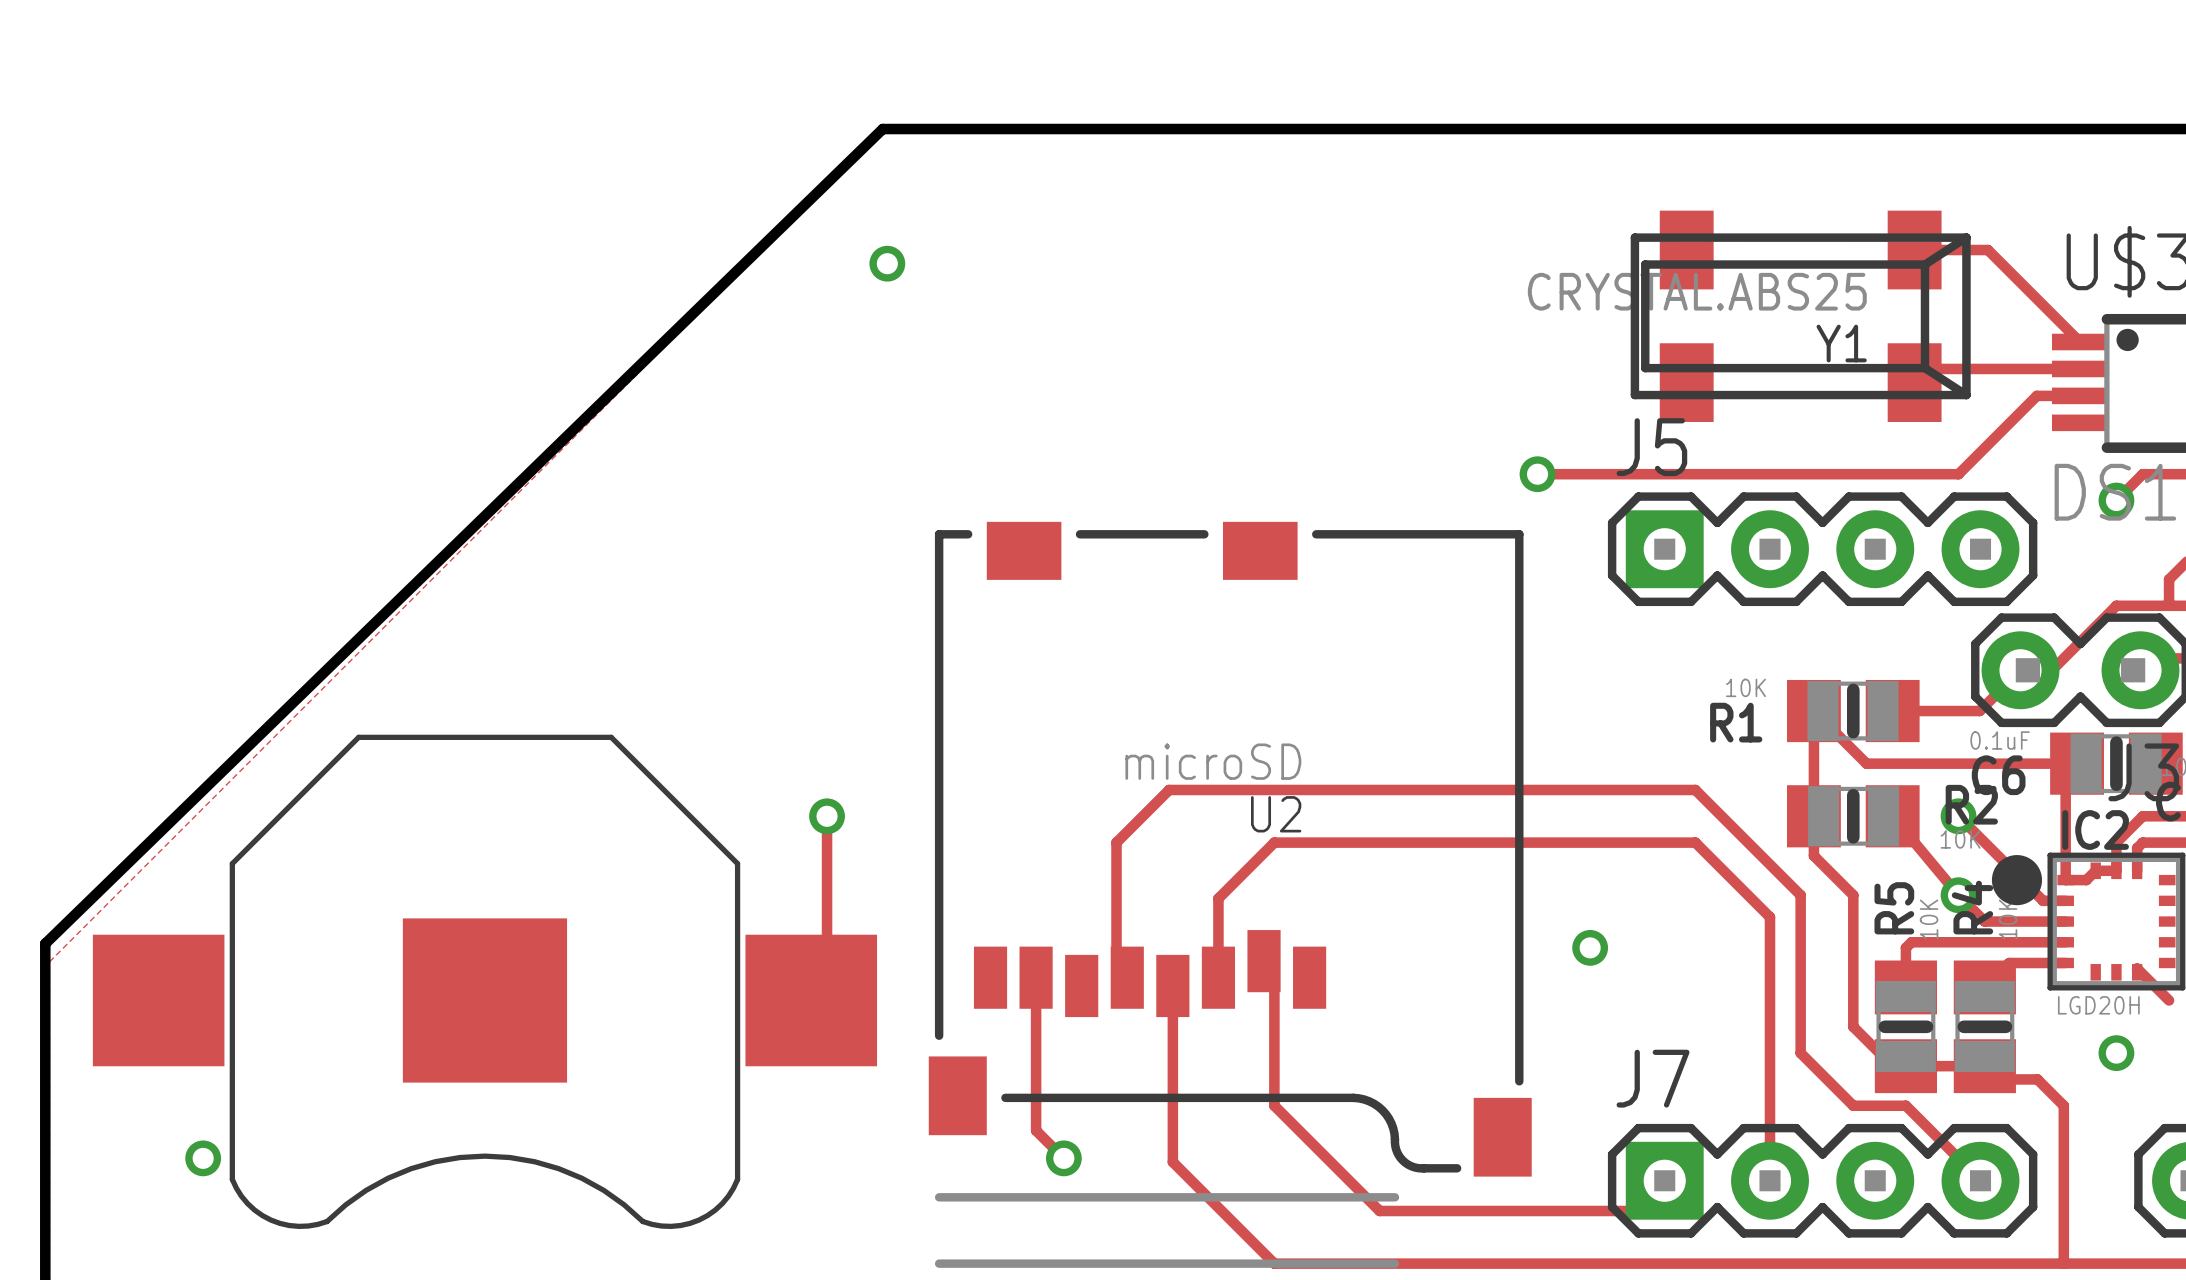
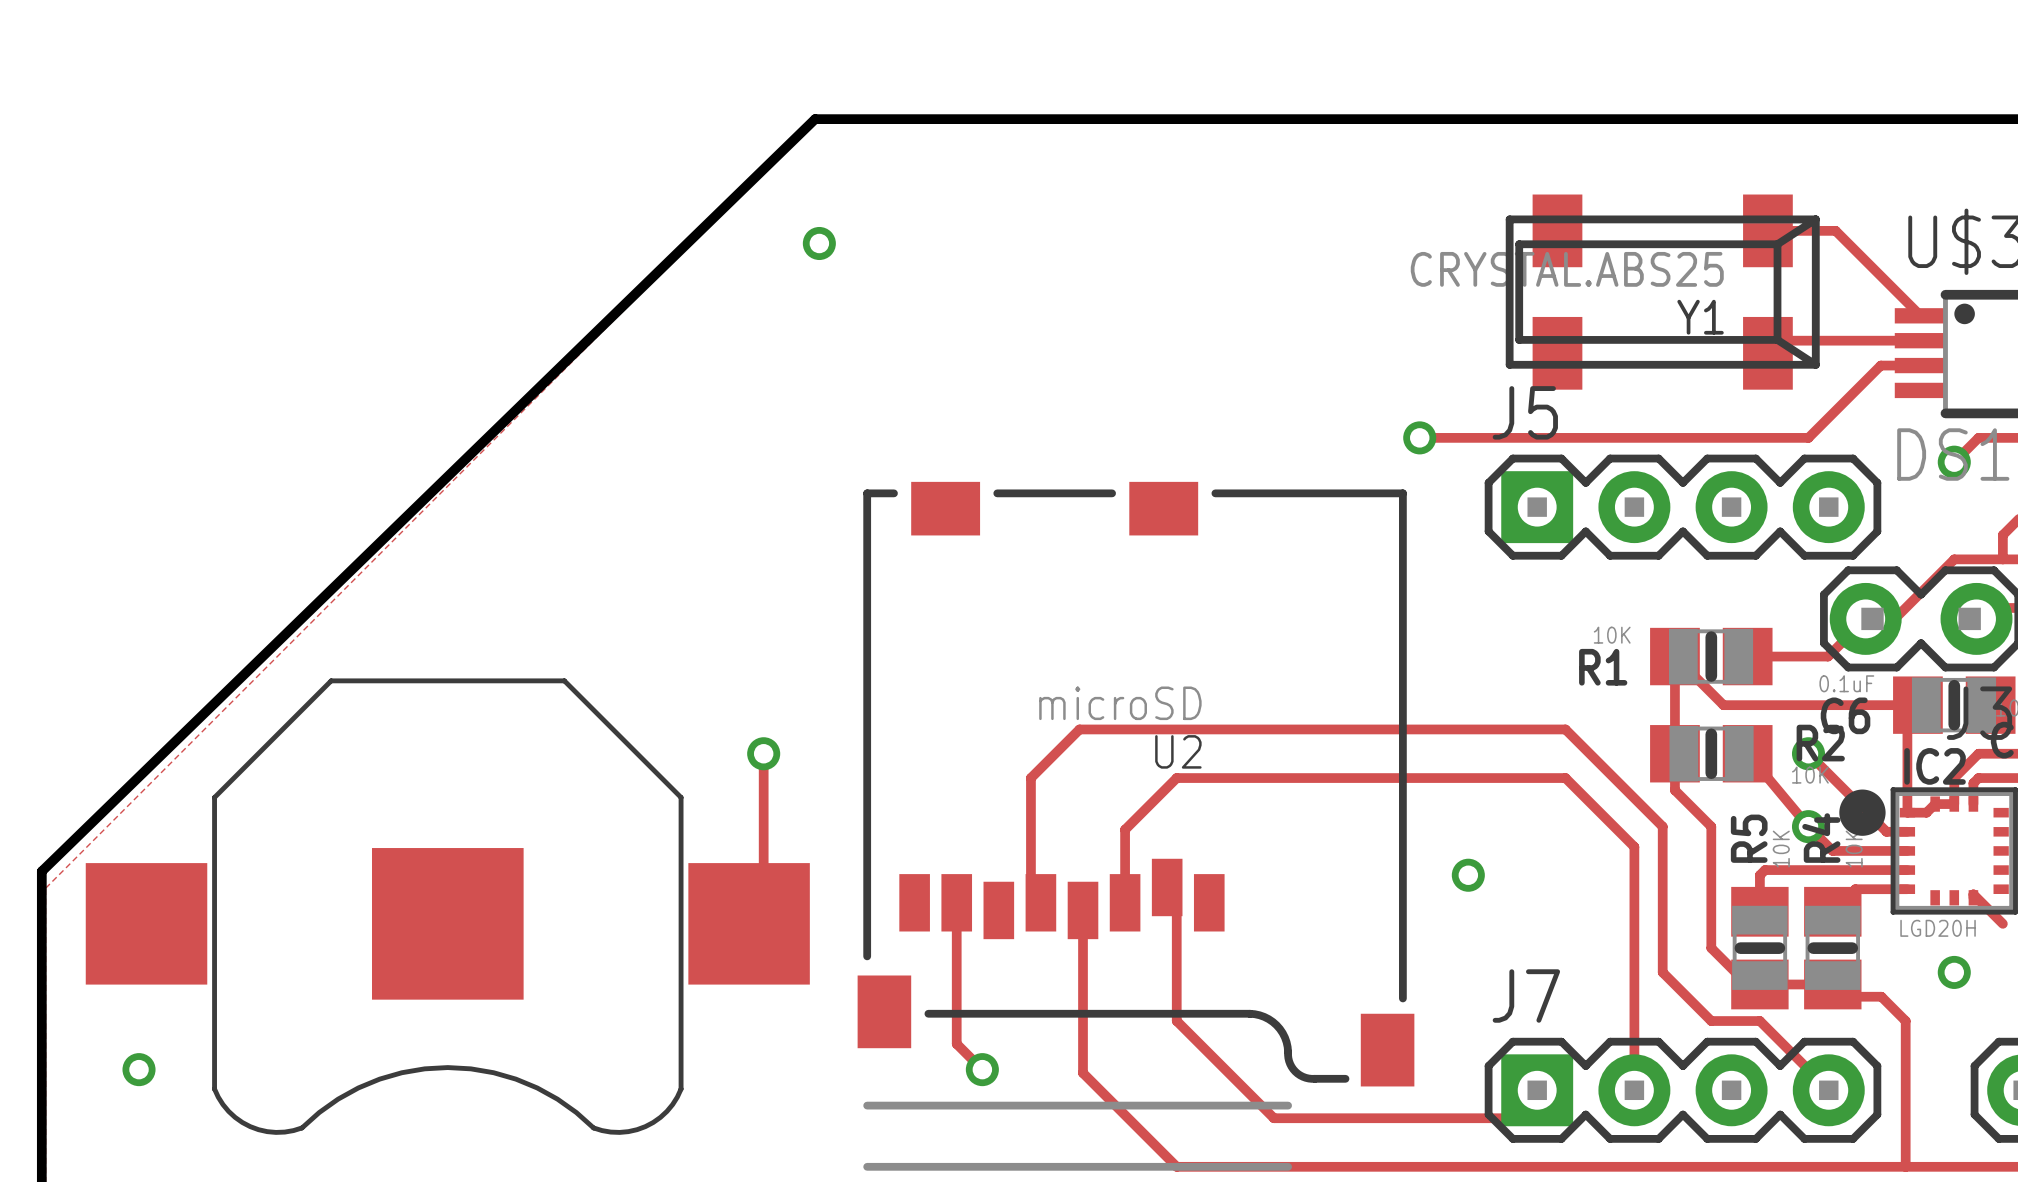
via position: (203, 1158) -> (139, 1069)

